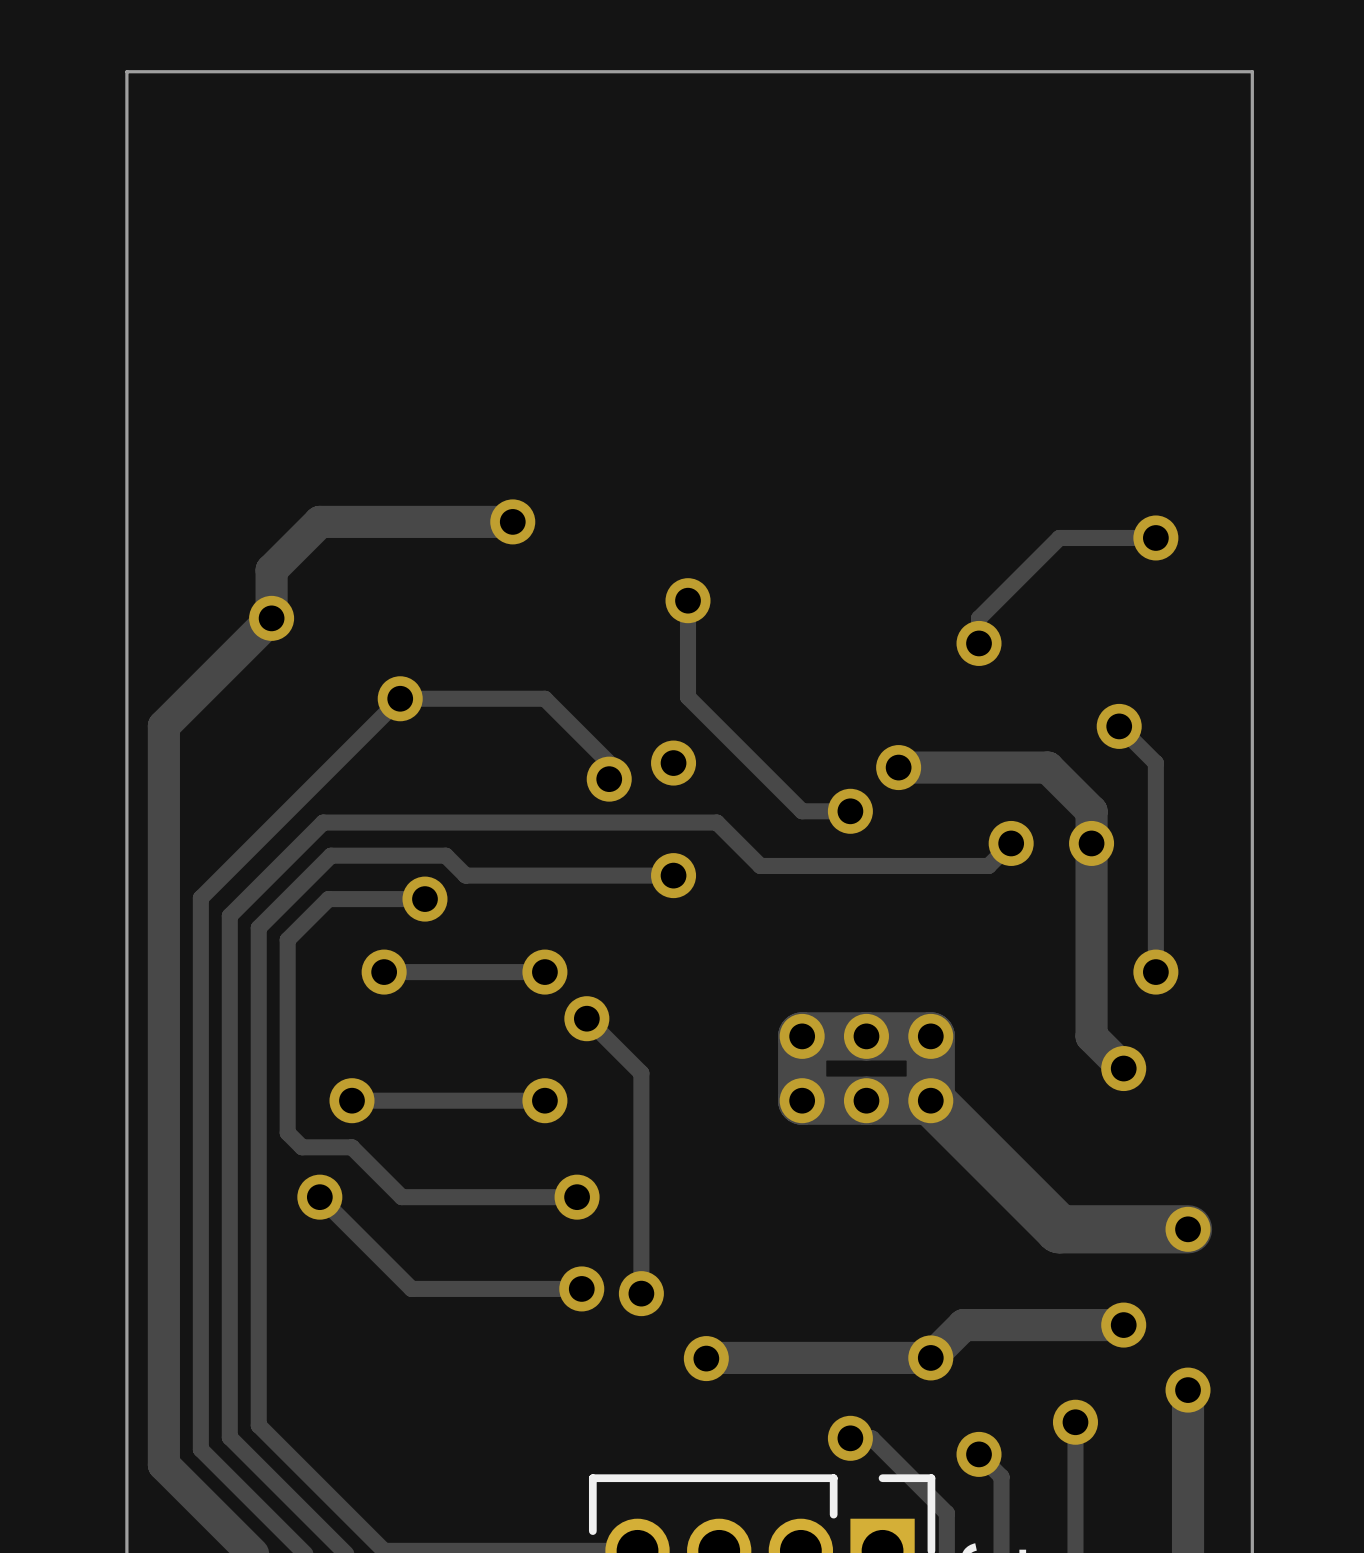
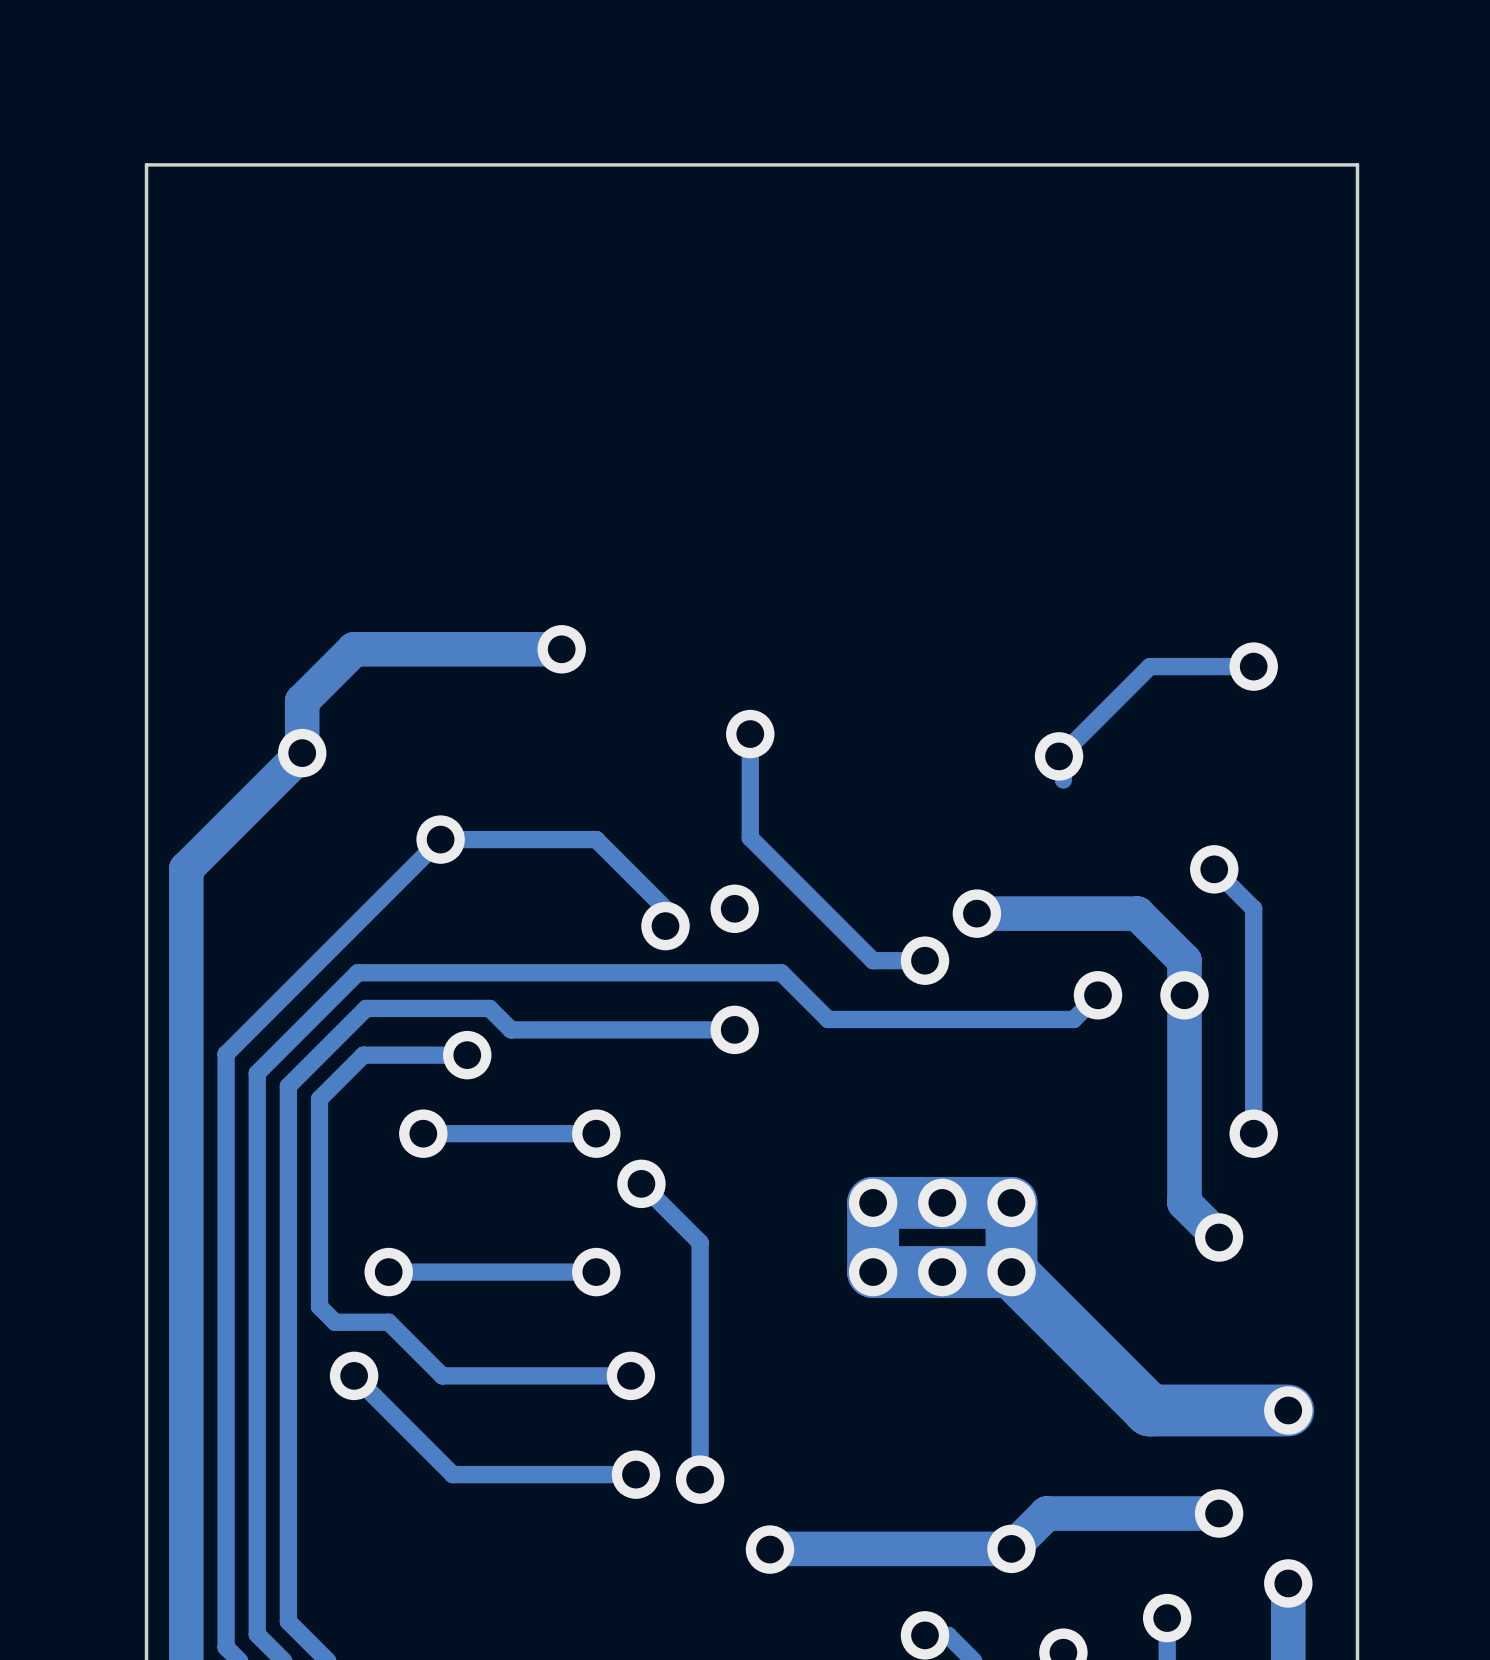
via position: (979, 643) -> (1059, 756)

